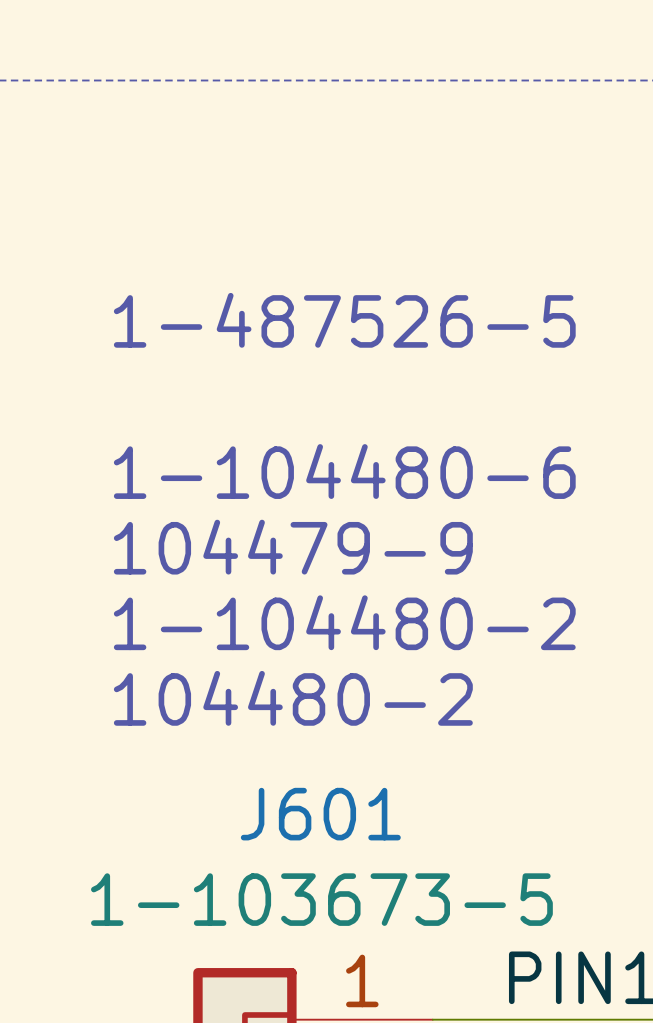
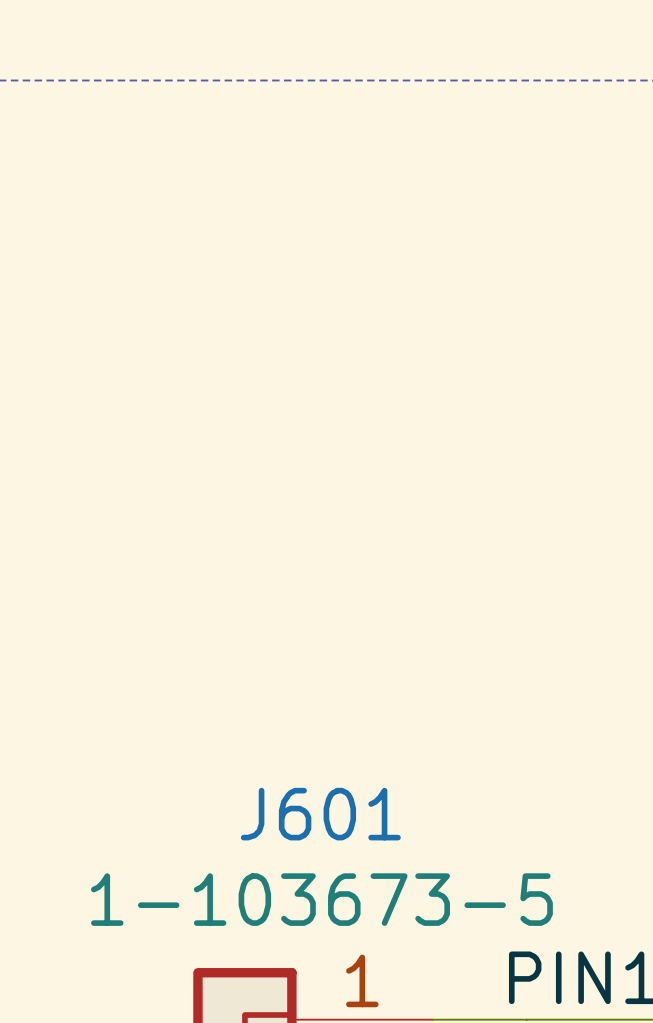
text: 1-487526-5 (344, 320) -> none
text: 1-104480-6 (344, 471) -> none
text: 104479-9 (293, 547) -> none
text: 1-104480-2 (344, 622) -> none
text: 104480-2 (293, 698) -> none

